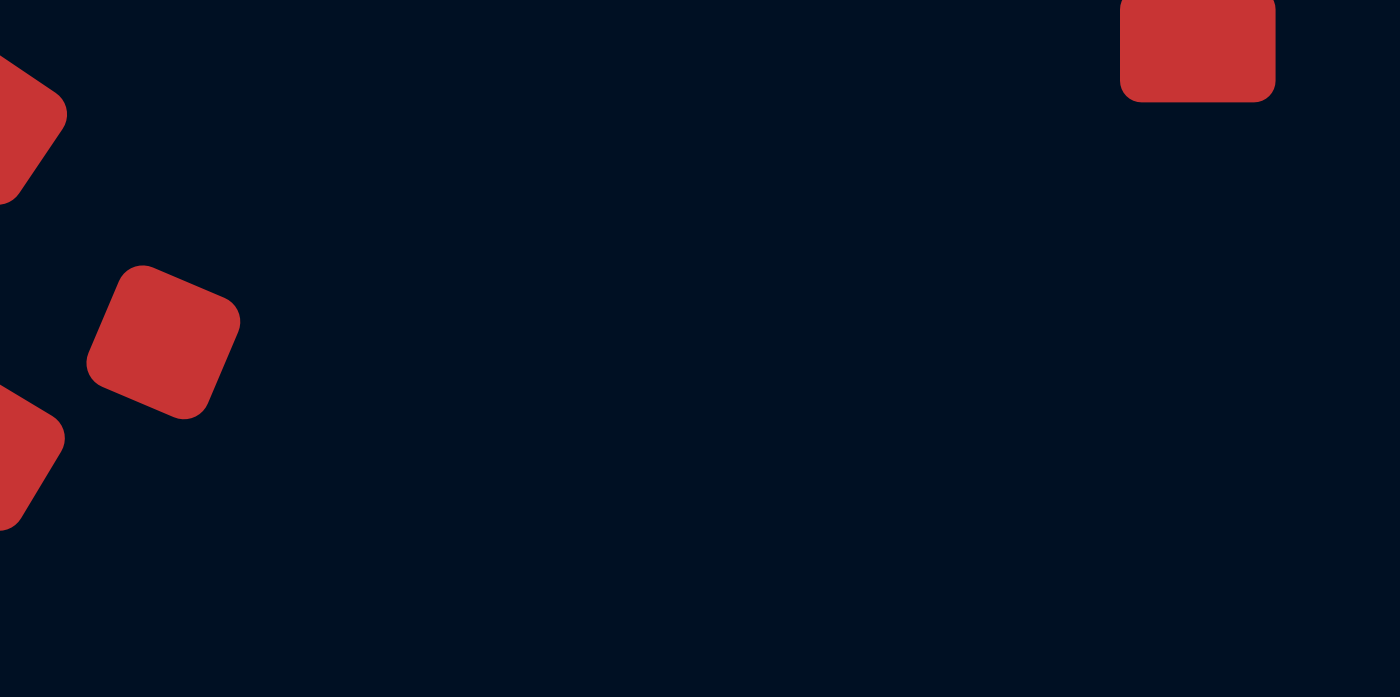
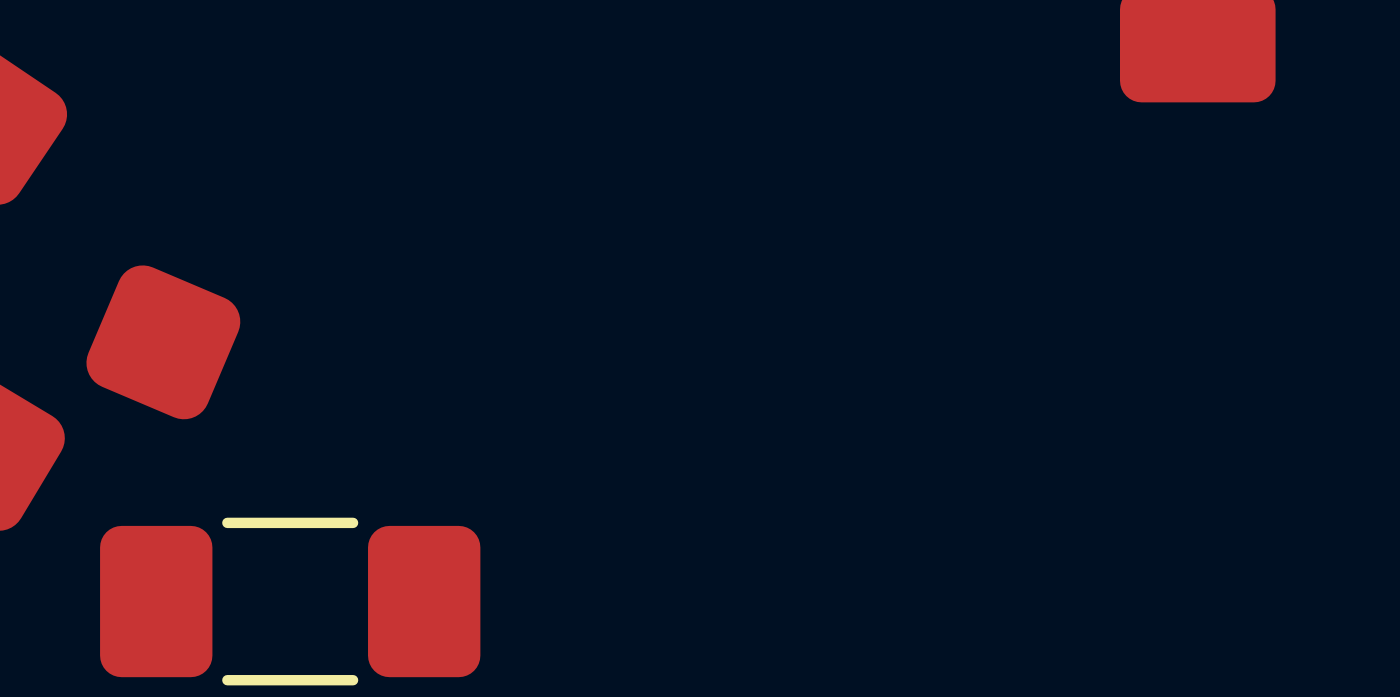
part: none -> (290, 601)

